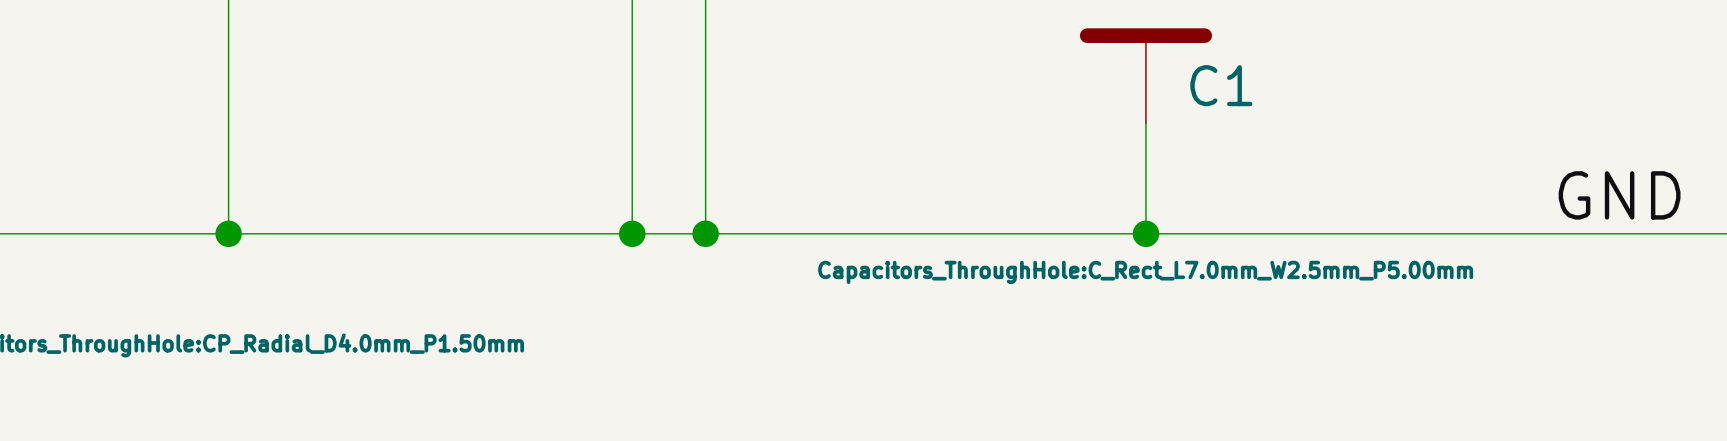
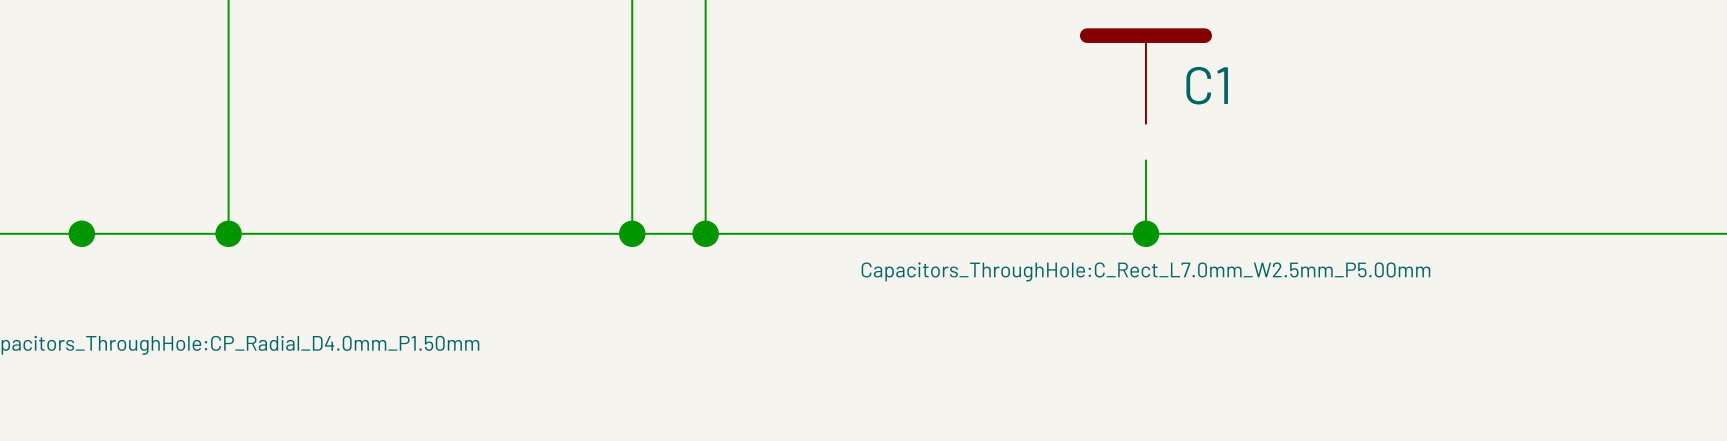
wire: (1145, 123) (1145, 160) -> none
label: GND (1619, 195) -> none
junction: none -> (81, 233)

